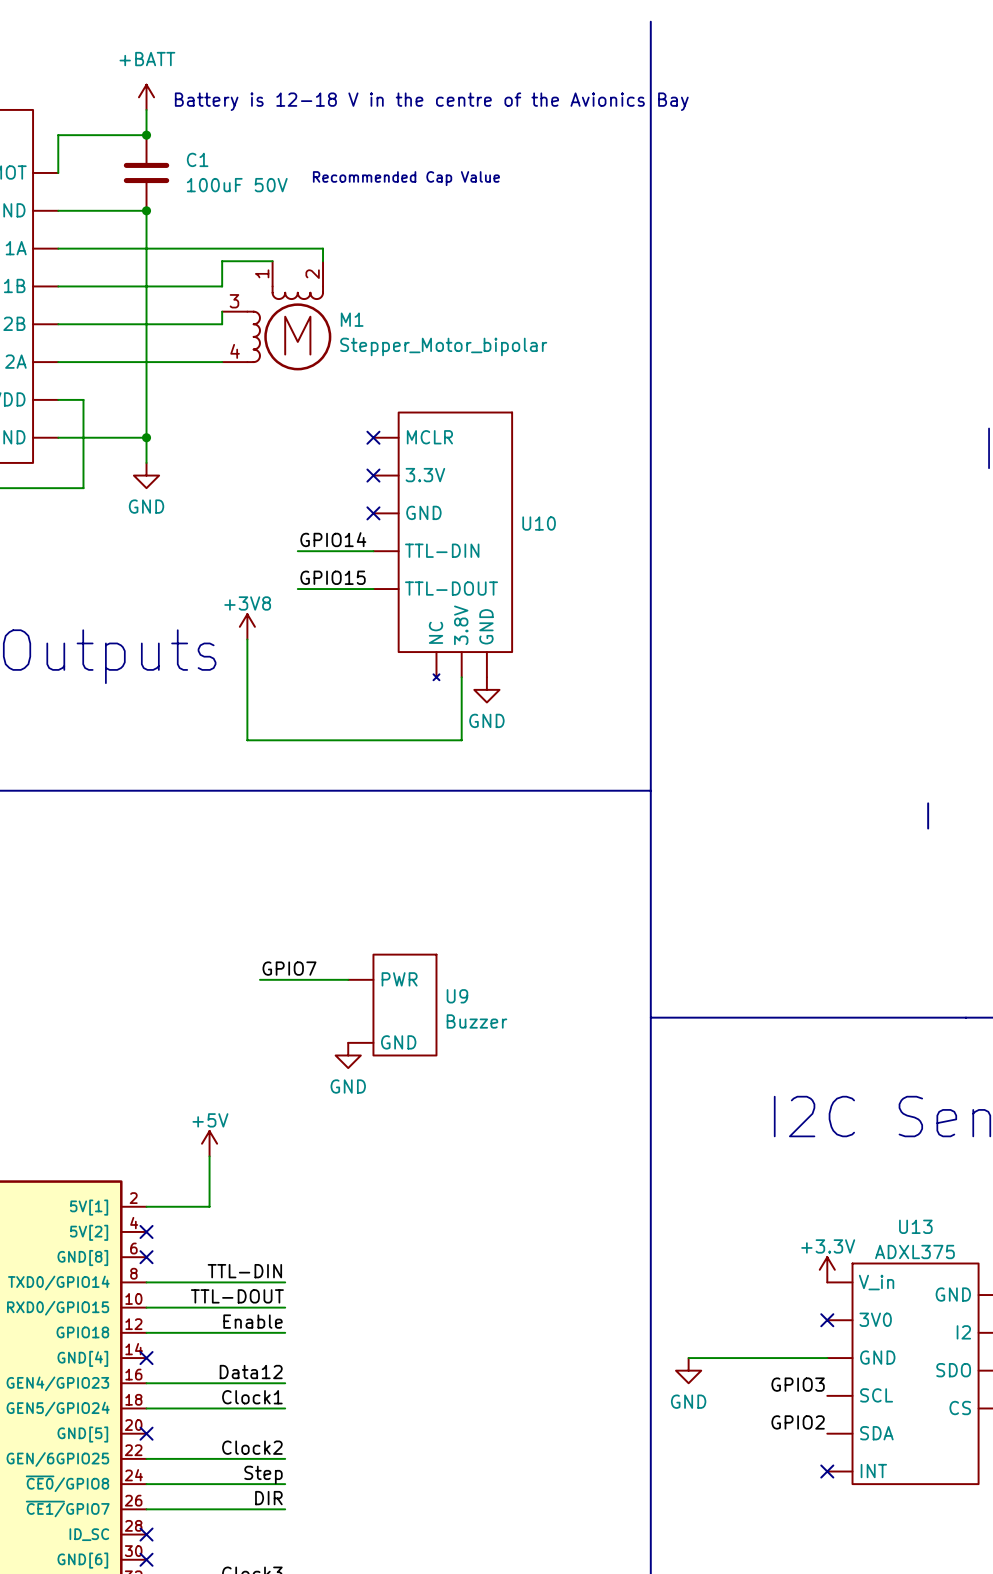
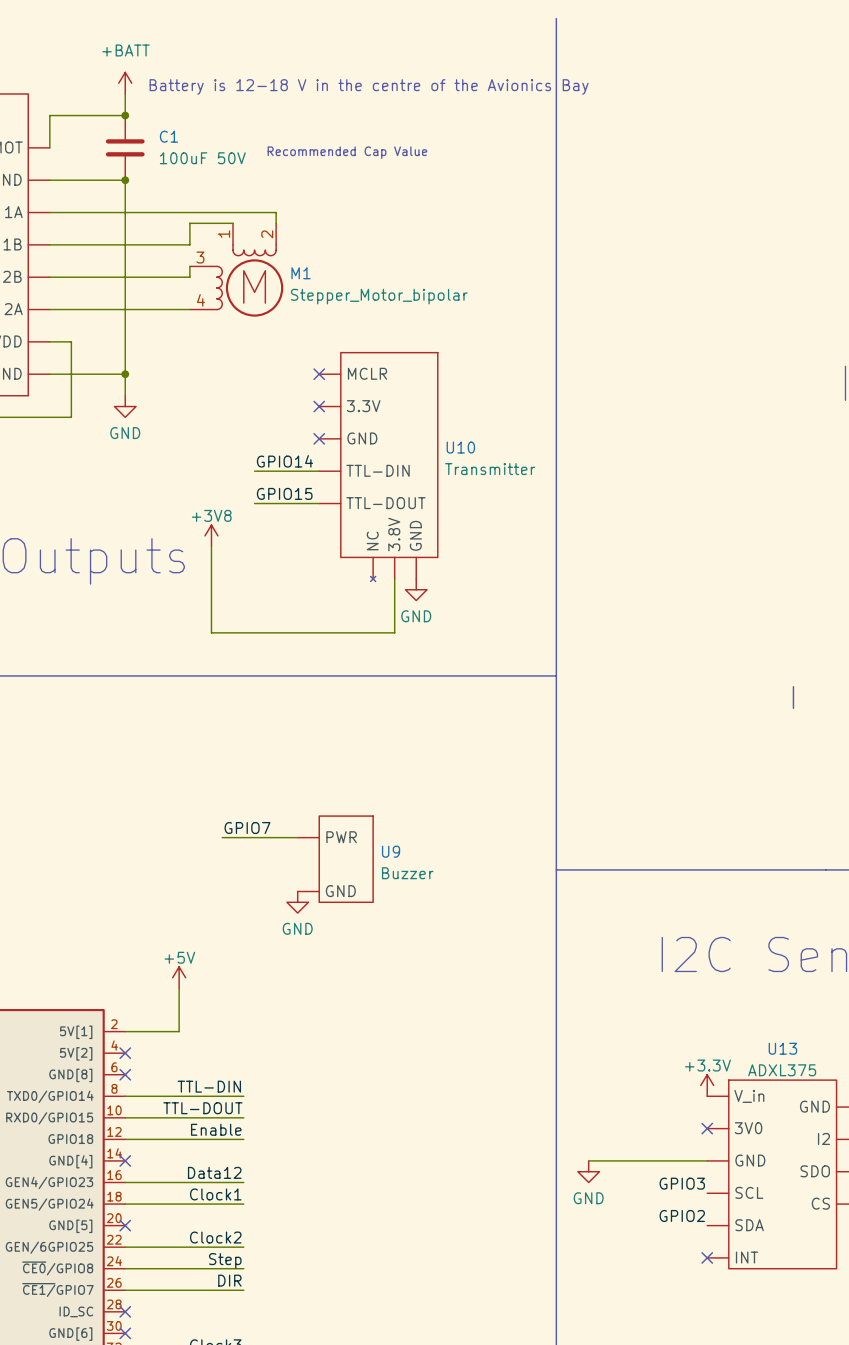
U10 value: none -> Transmitter (490, 469)

